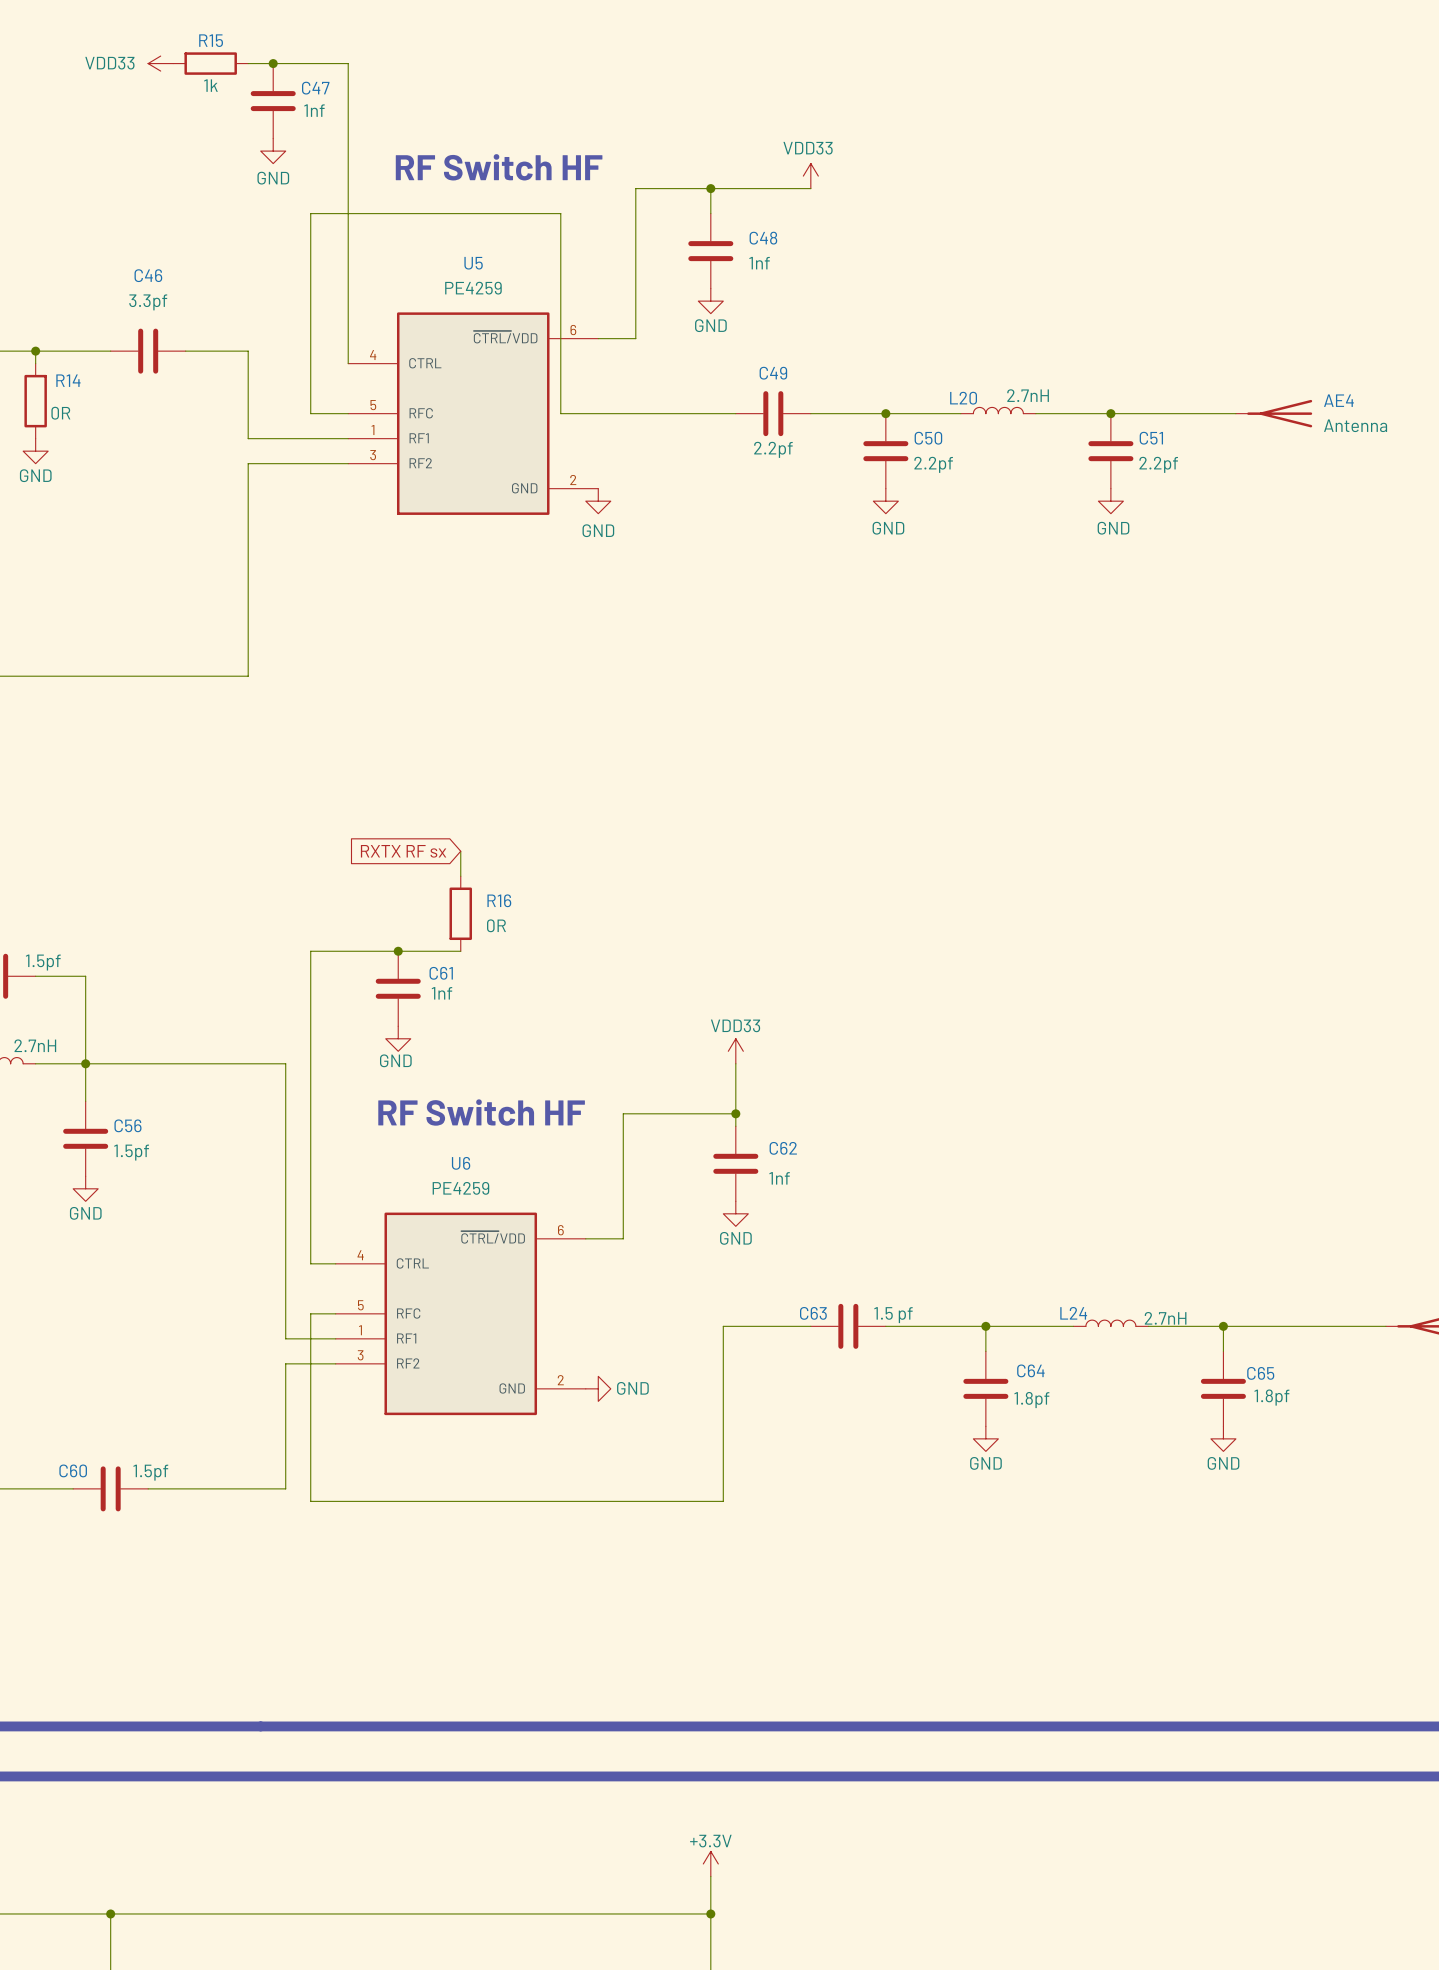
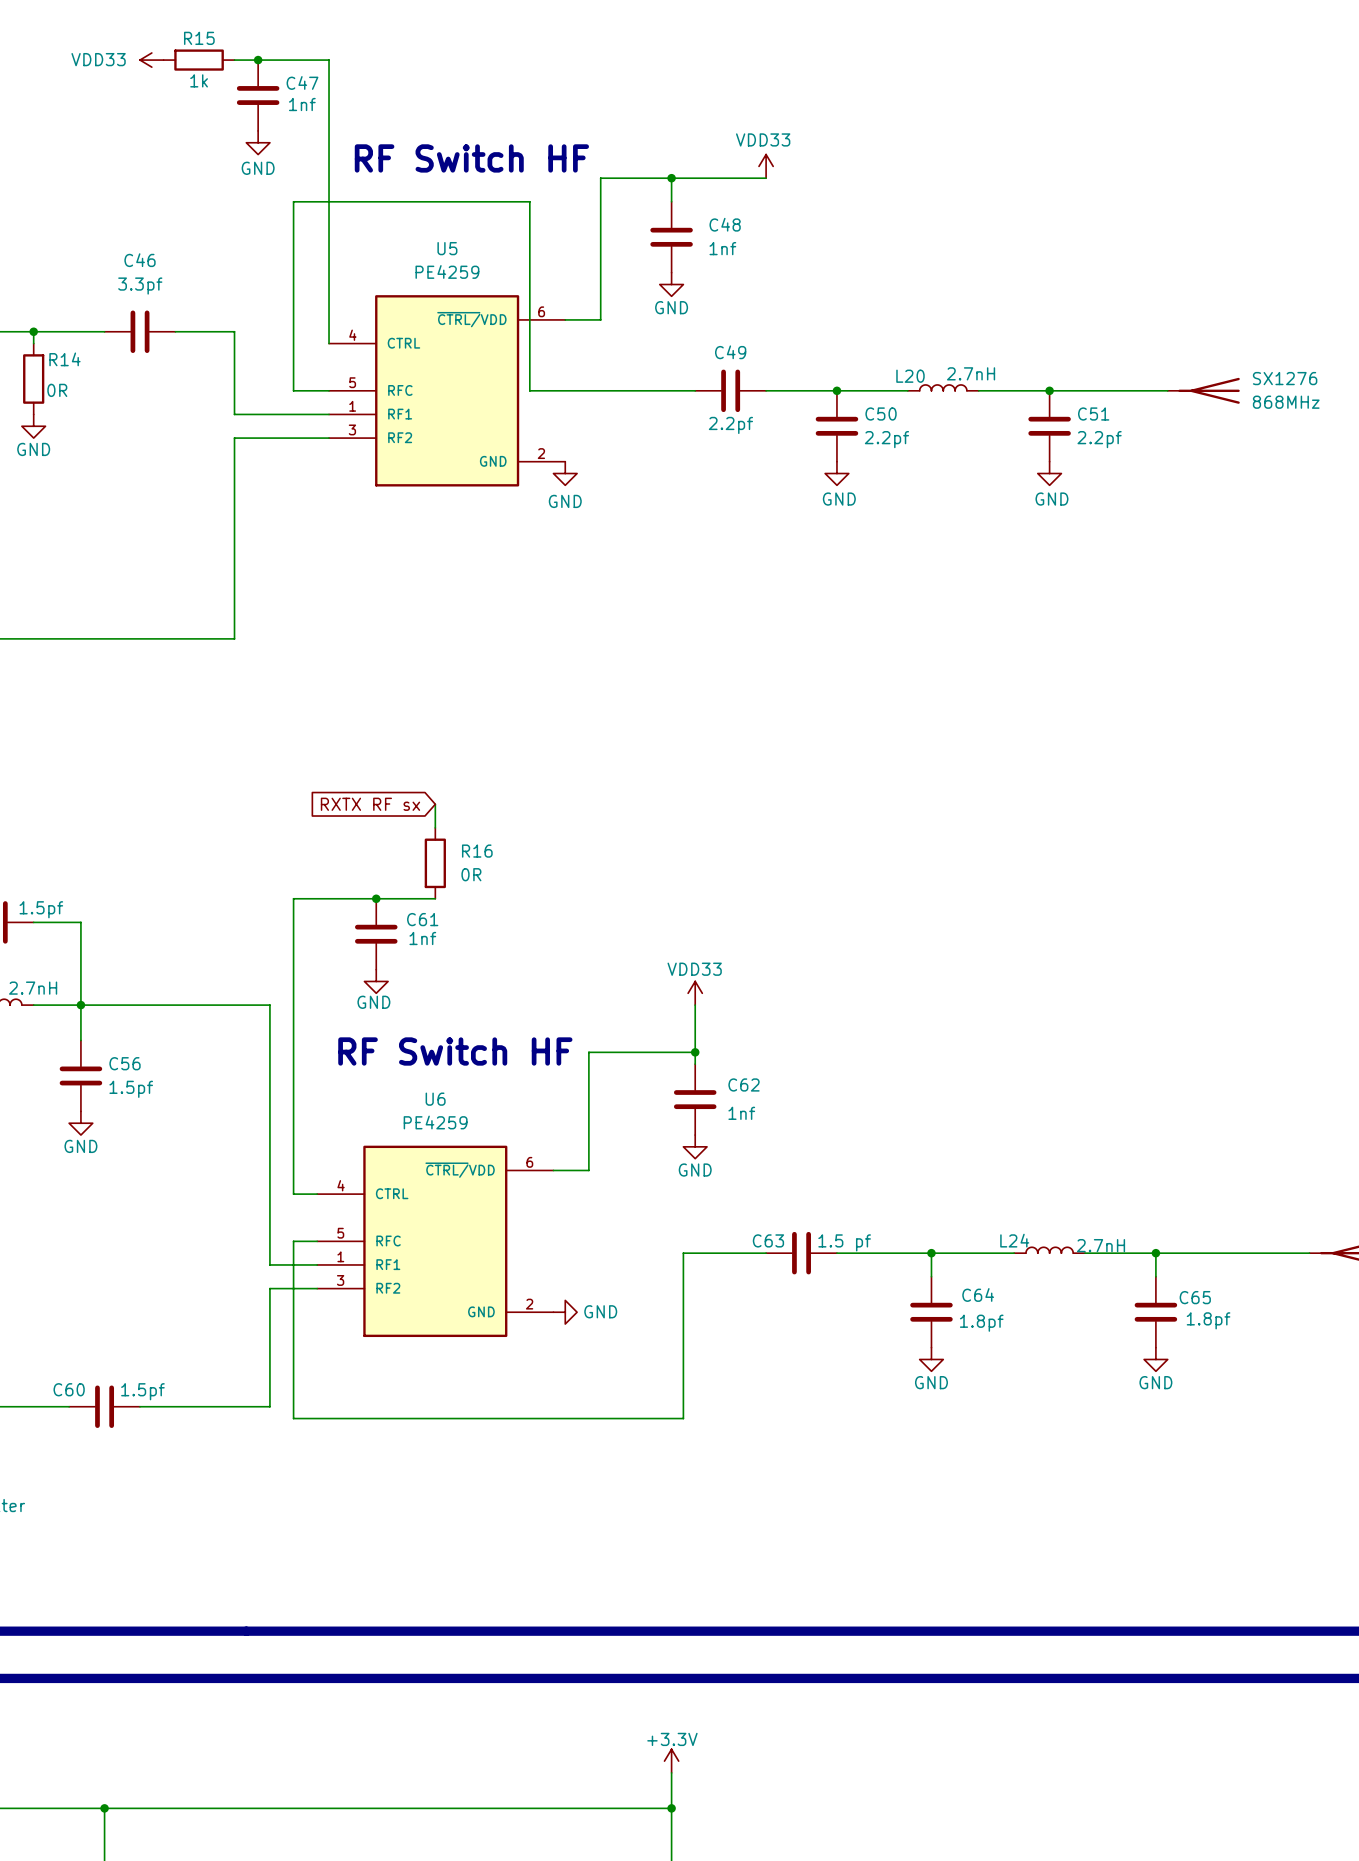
AE4 name: AE4 (1338, 400) -> SX1276 (1285, 378)
AE4 value: Antenna (1355, 425) -> 868MHz (1286, 402)

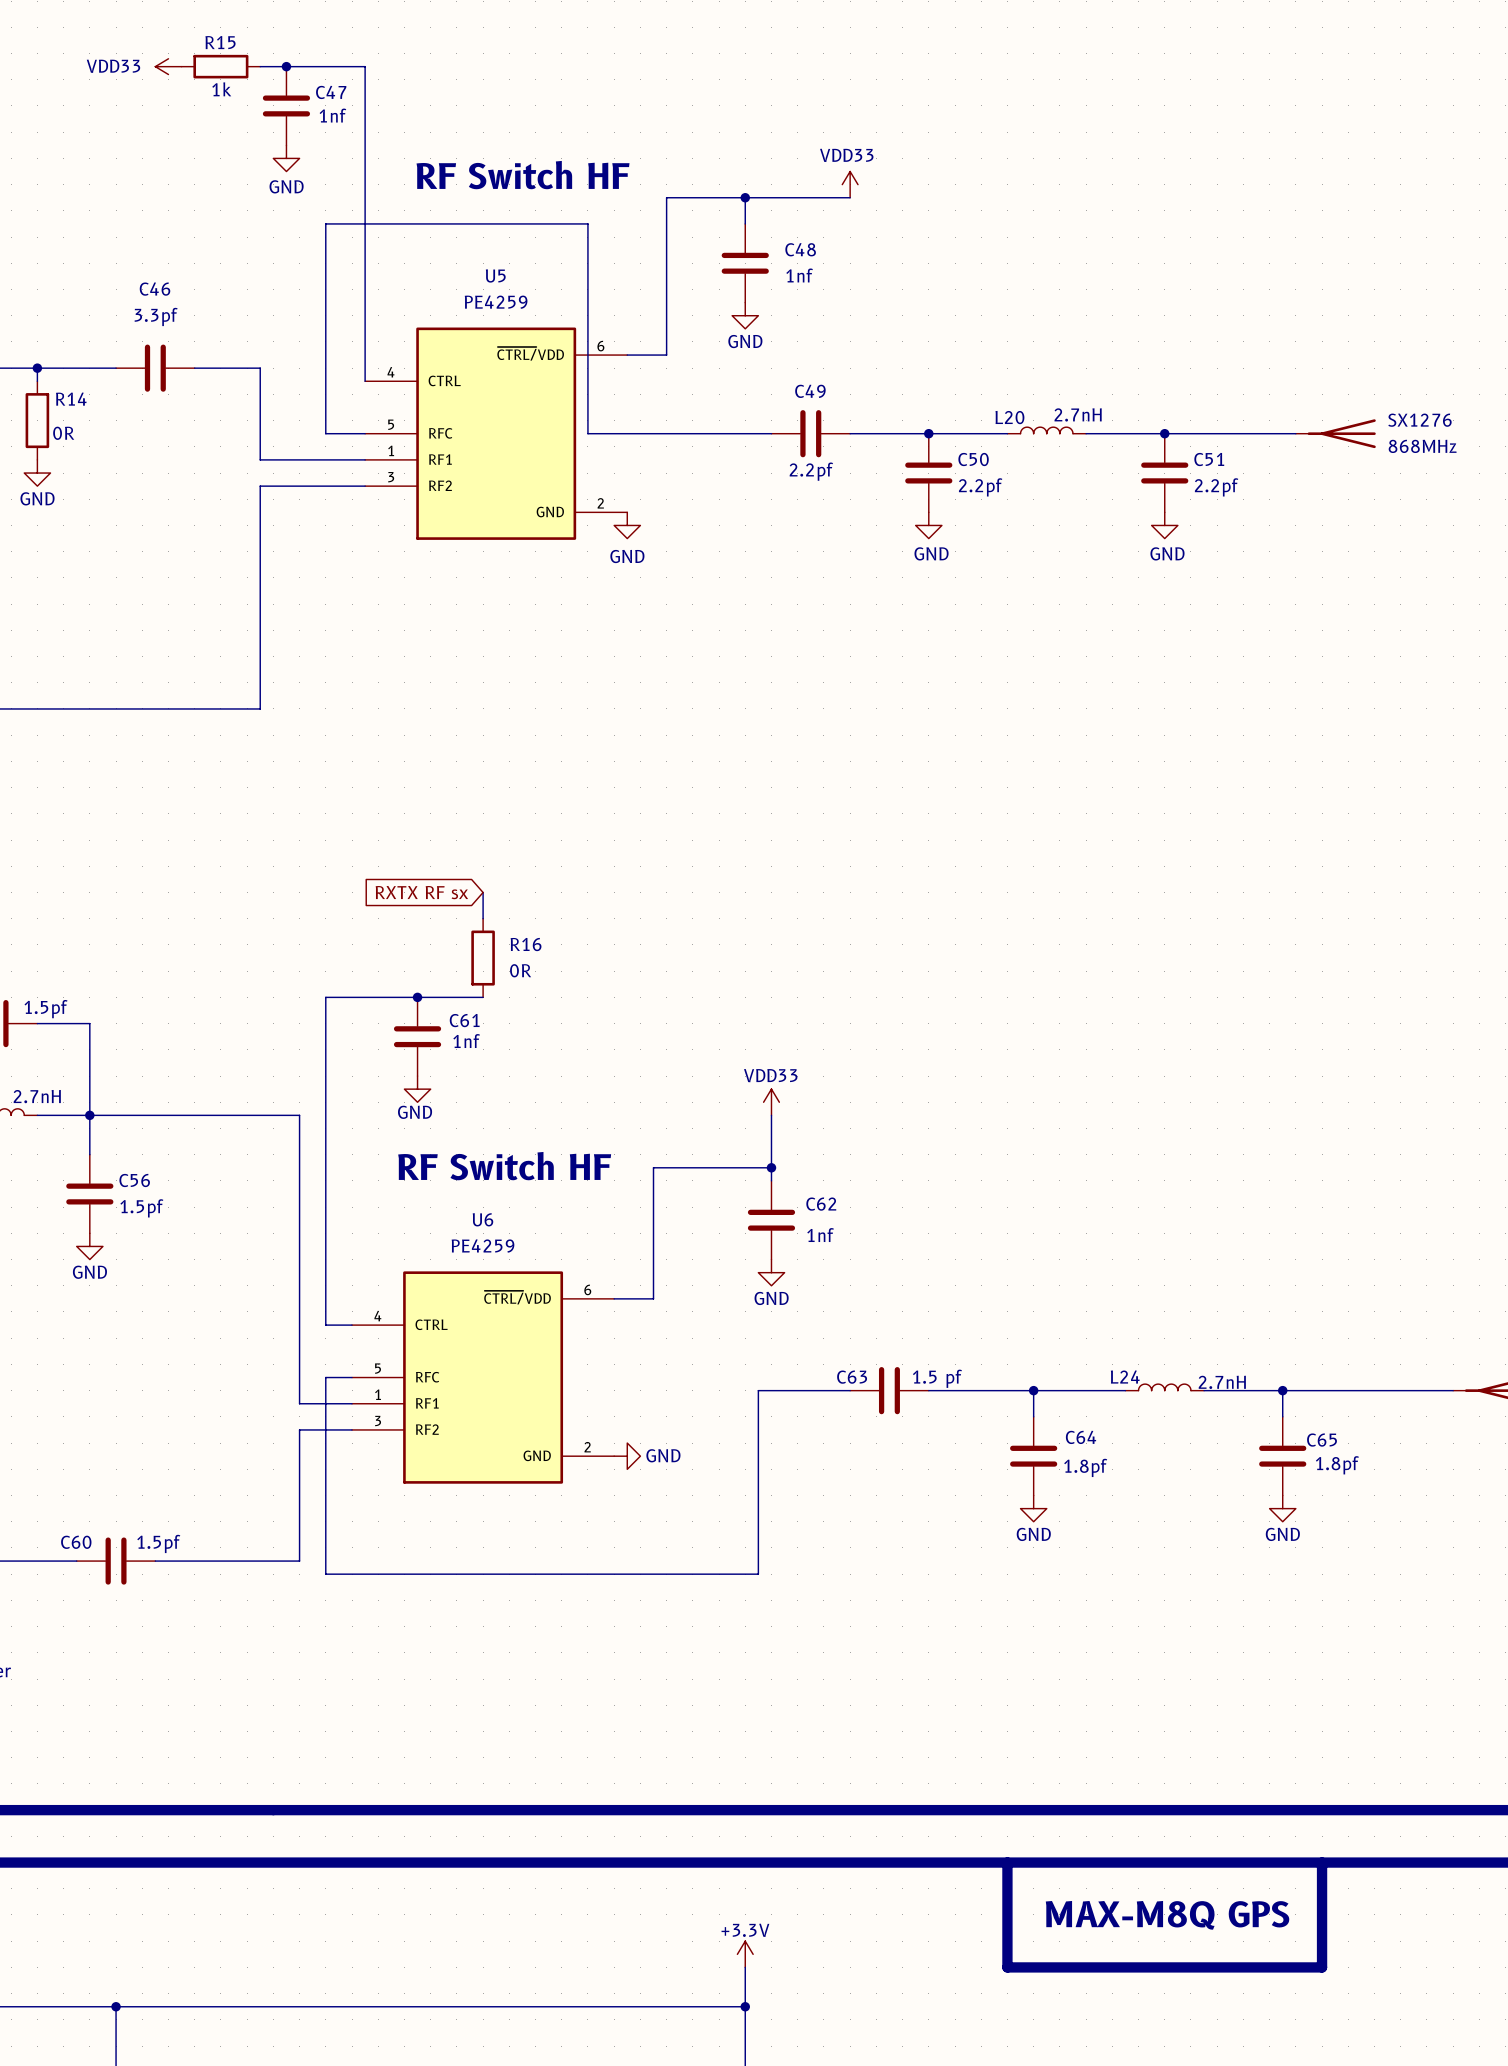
line: none -> (1007, 1862) (1007, 1967) (1322, 1967) (1322, 1862)
text: none -> MAX-M8Q GPS (1167, 1915)

